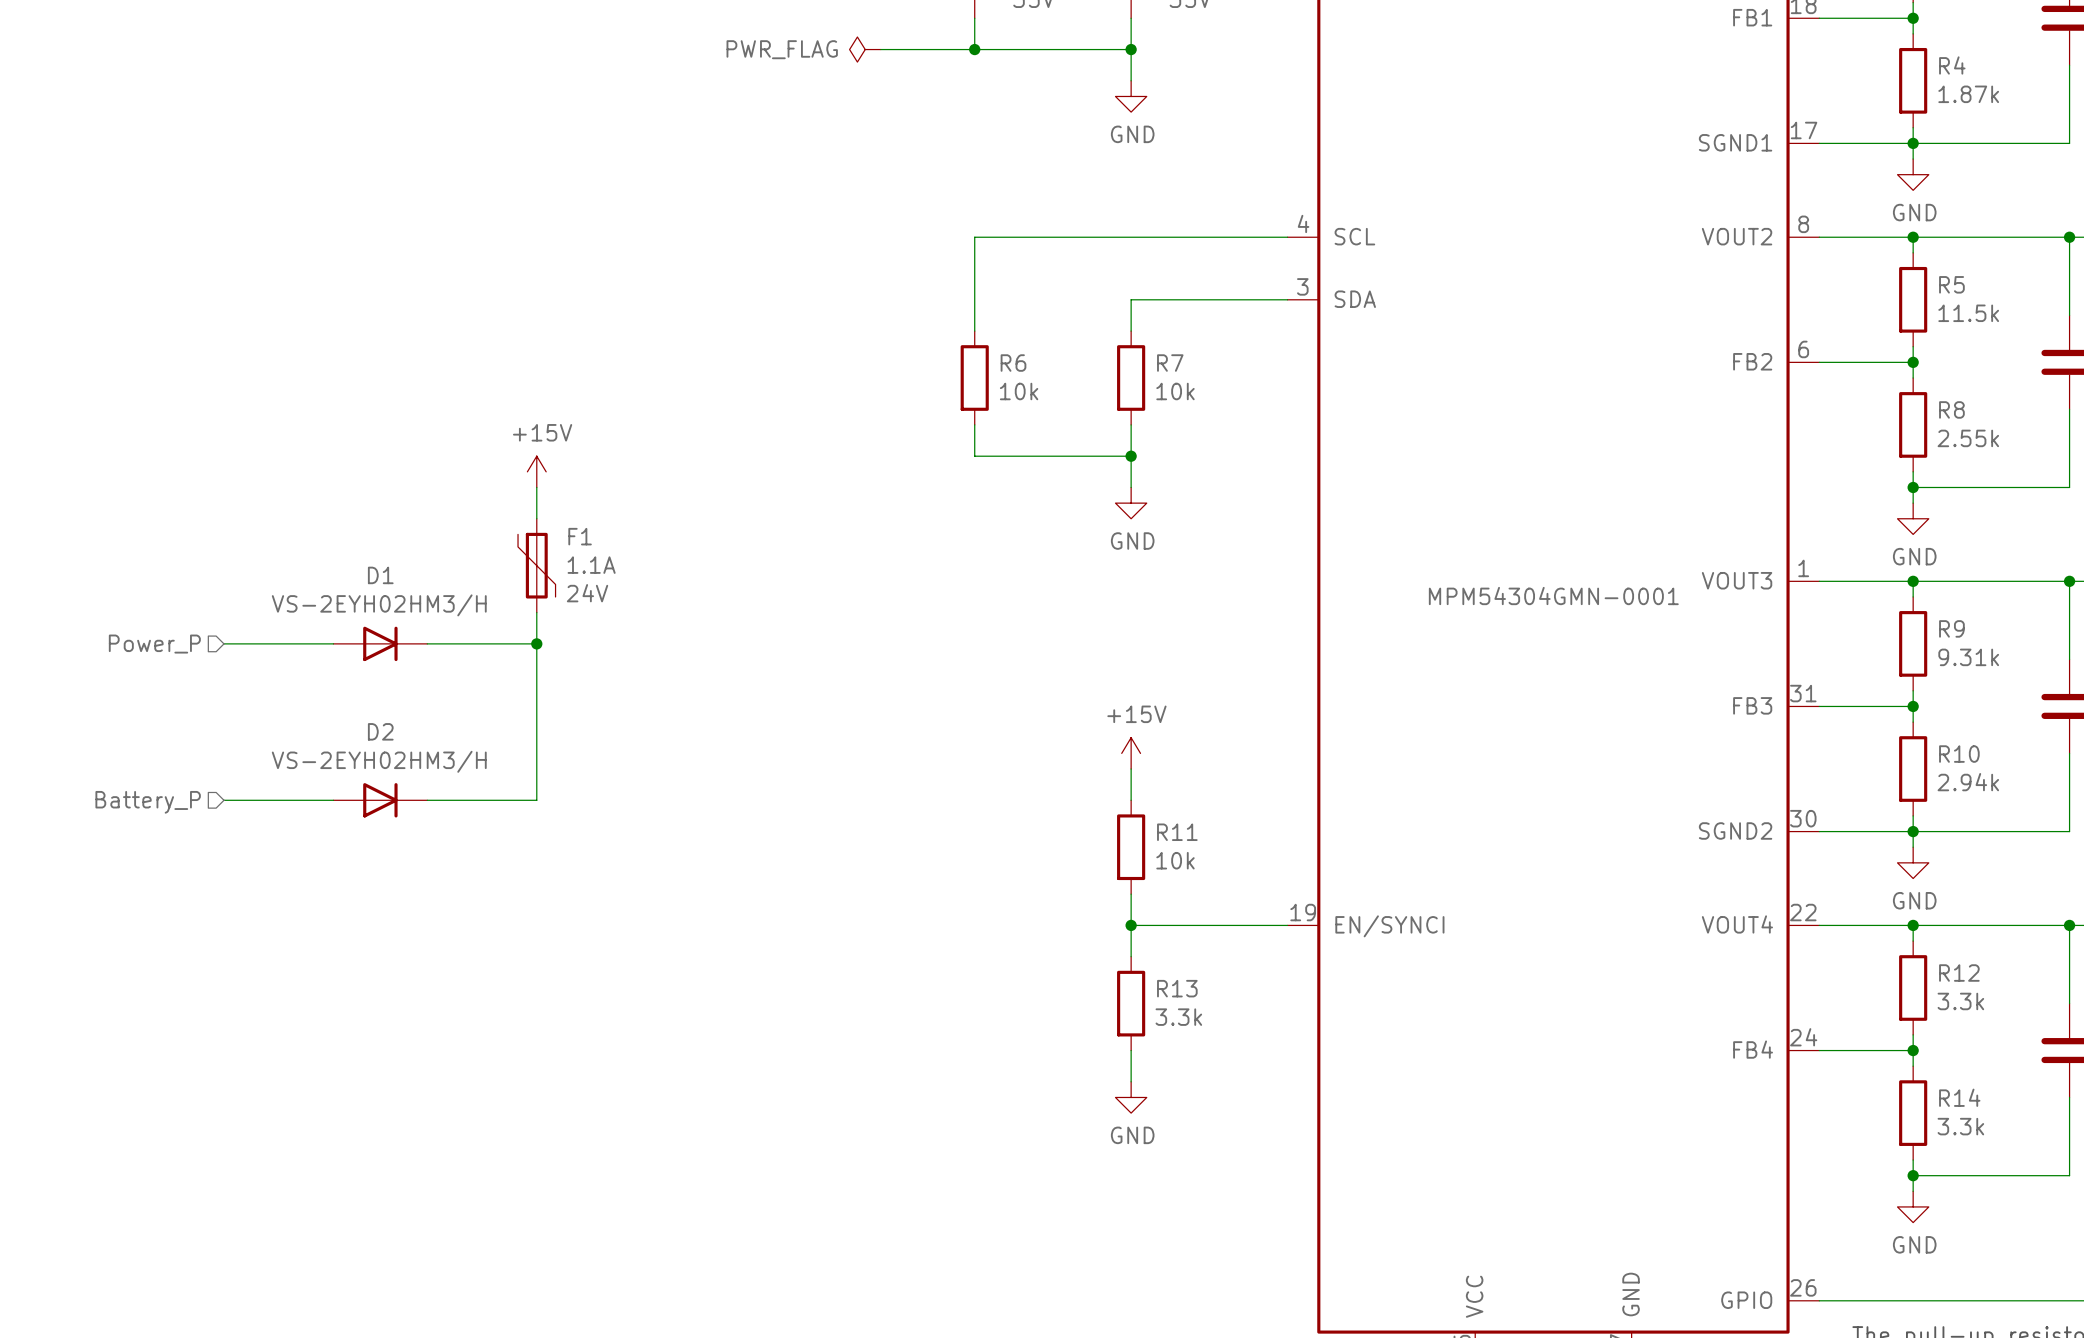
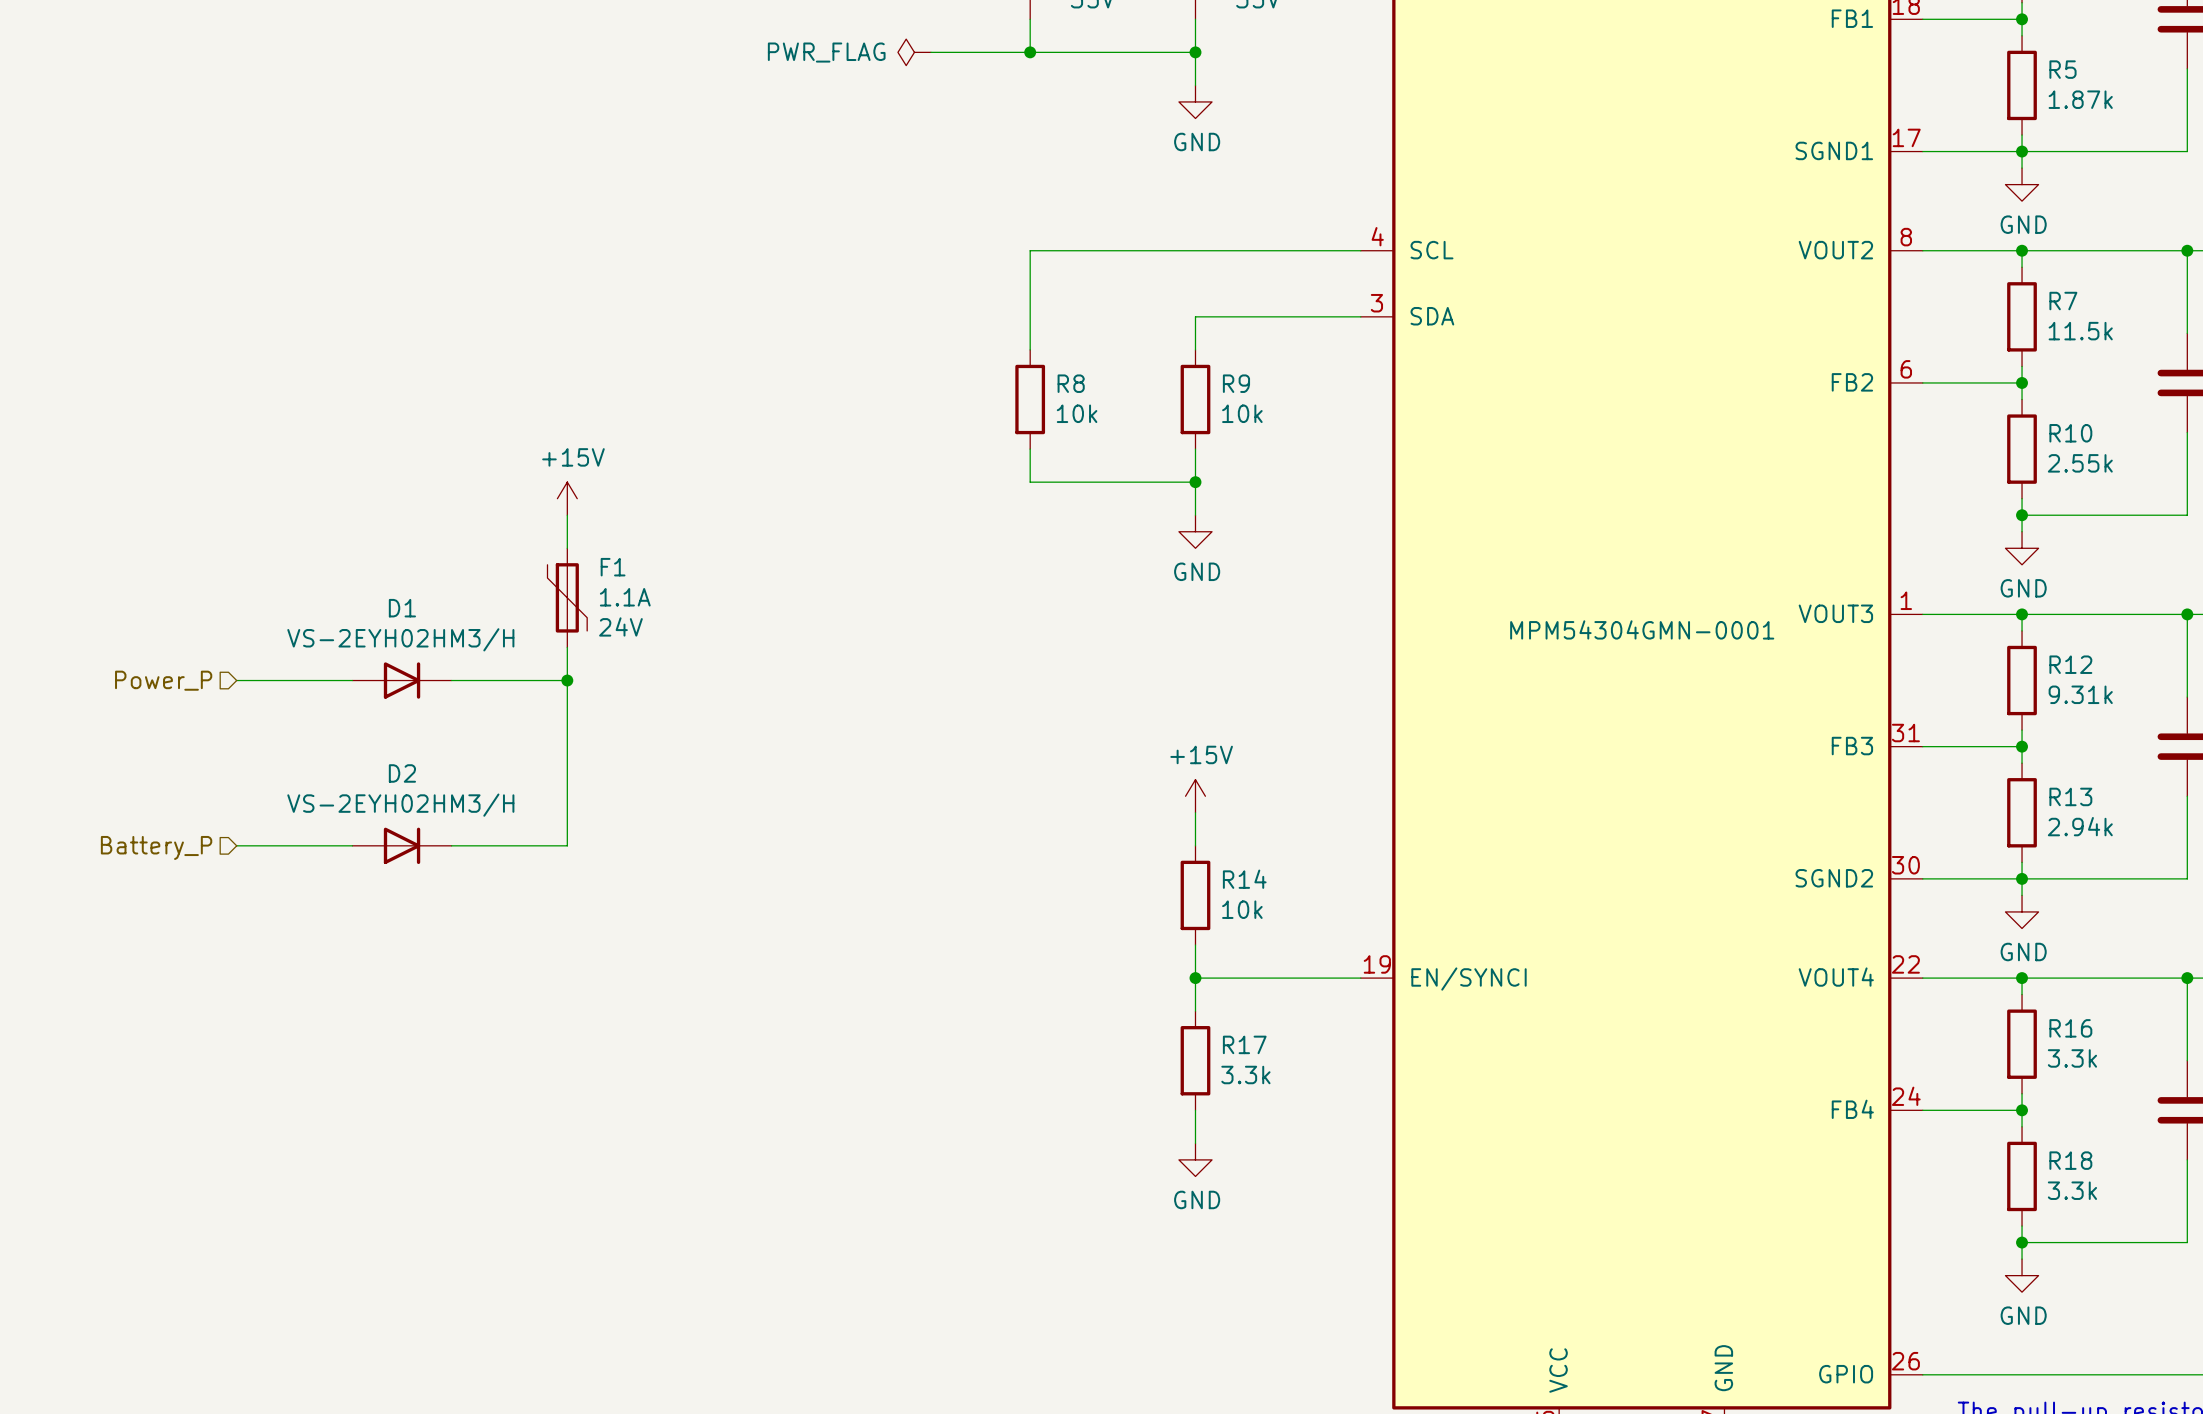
R4 name: R4 (1952, 65) -> R5 (2062, 69)
R5 name: R5 (1951, 284) -> R7 (2063, 301)
R6 name: R6 (1013, 363) -> R8 (1071, 383)
R7 name: R7 (1170, 363) -> R9 (1236, 383)
R8 name: R8 (1951, 409) -> R10 (2070, 433)
R9 name: R9 (1951, 628) -> R12 (2070, 664)
R10 name: R10 (1959, 754) -> R13 (2070, 796)
R11 name: R11 (1177, 832) -> R14 (1244, 879)
R12 name: R12 (1959, 973) -> R16 (2070, 1028)
R13 name: R13 (1177, 988) -> R17 (1244, 1044)
R14 name: R14 (1959, 1097) -> R18 (2070, 1160)

